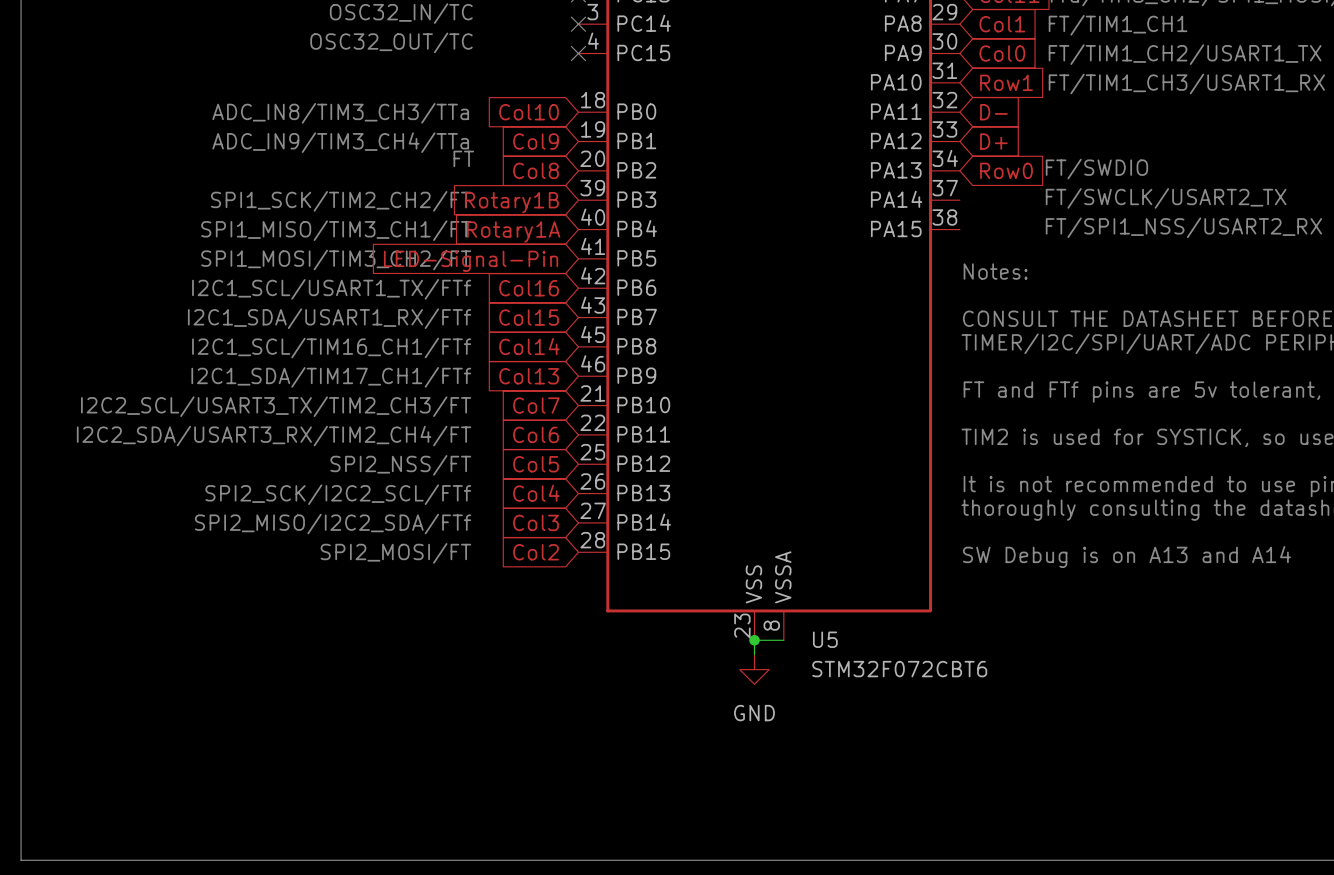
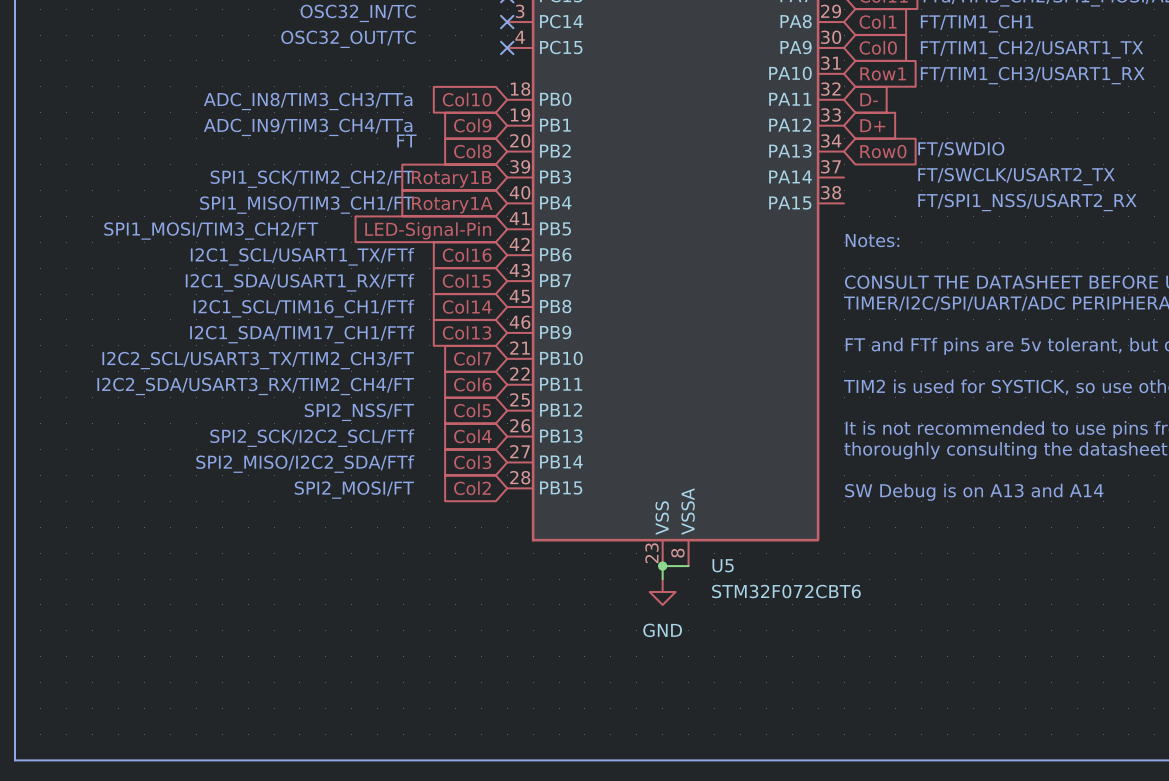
text position: SPI1_MOSI/TIM3_CH2/FT (336, 260) -> SPI1_MOSI/TIM3_CH2/FT (211, 231)

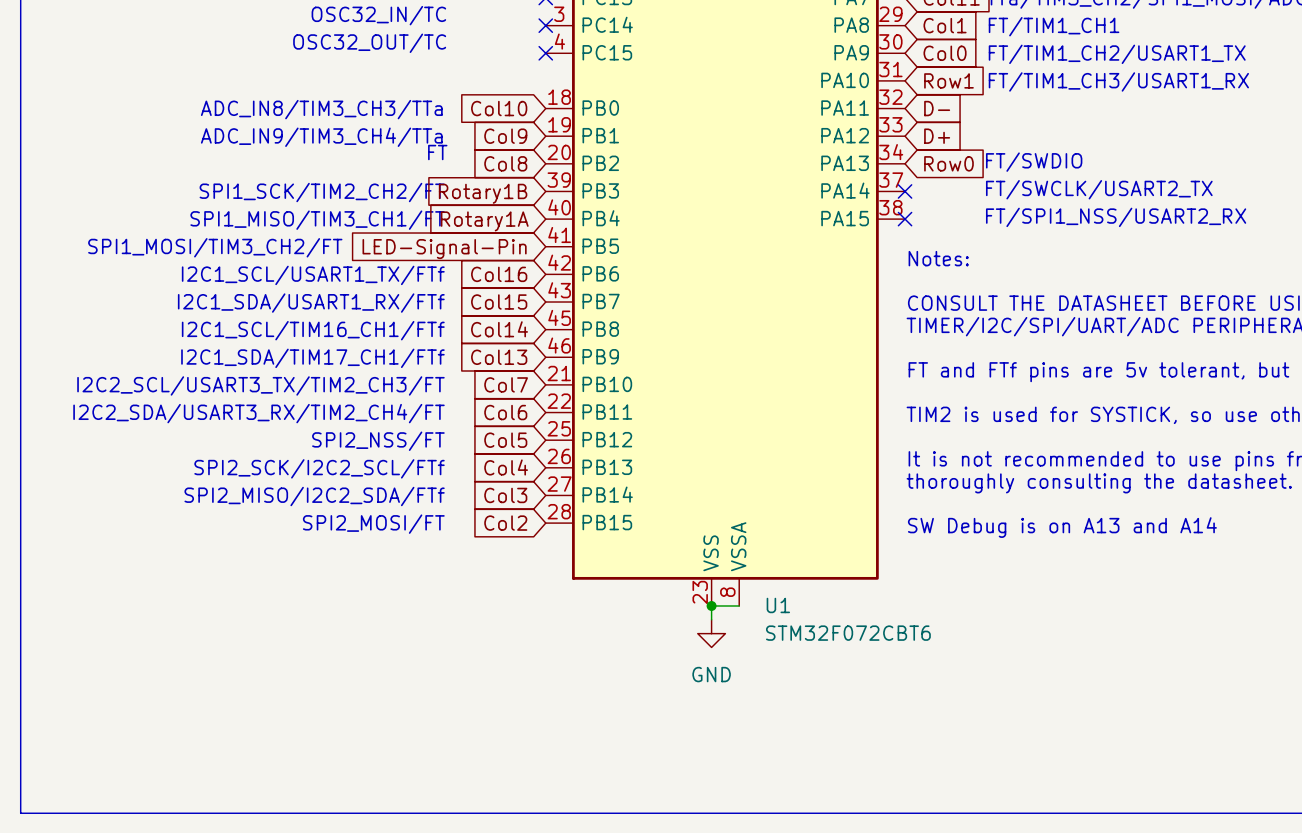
no-connect mark: none -> (905, 191)
no-connect mark: none -> (905, 219)
U5 name: U5 (723, 565) -> U1 (778, 605)

